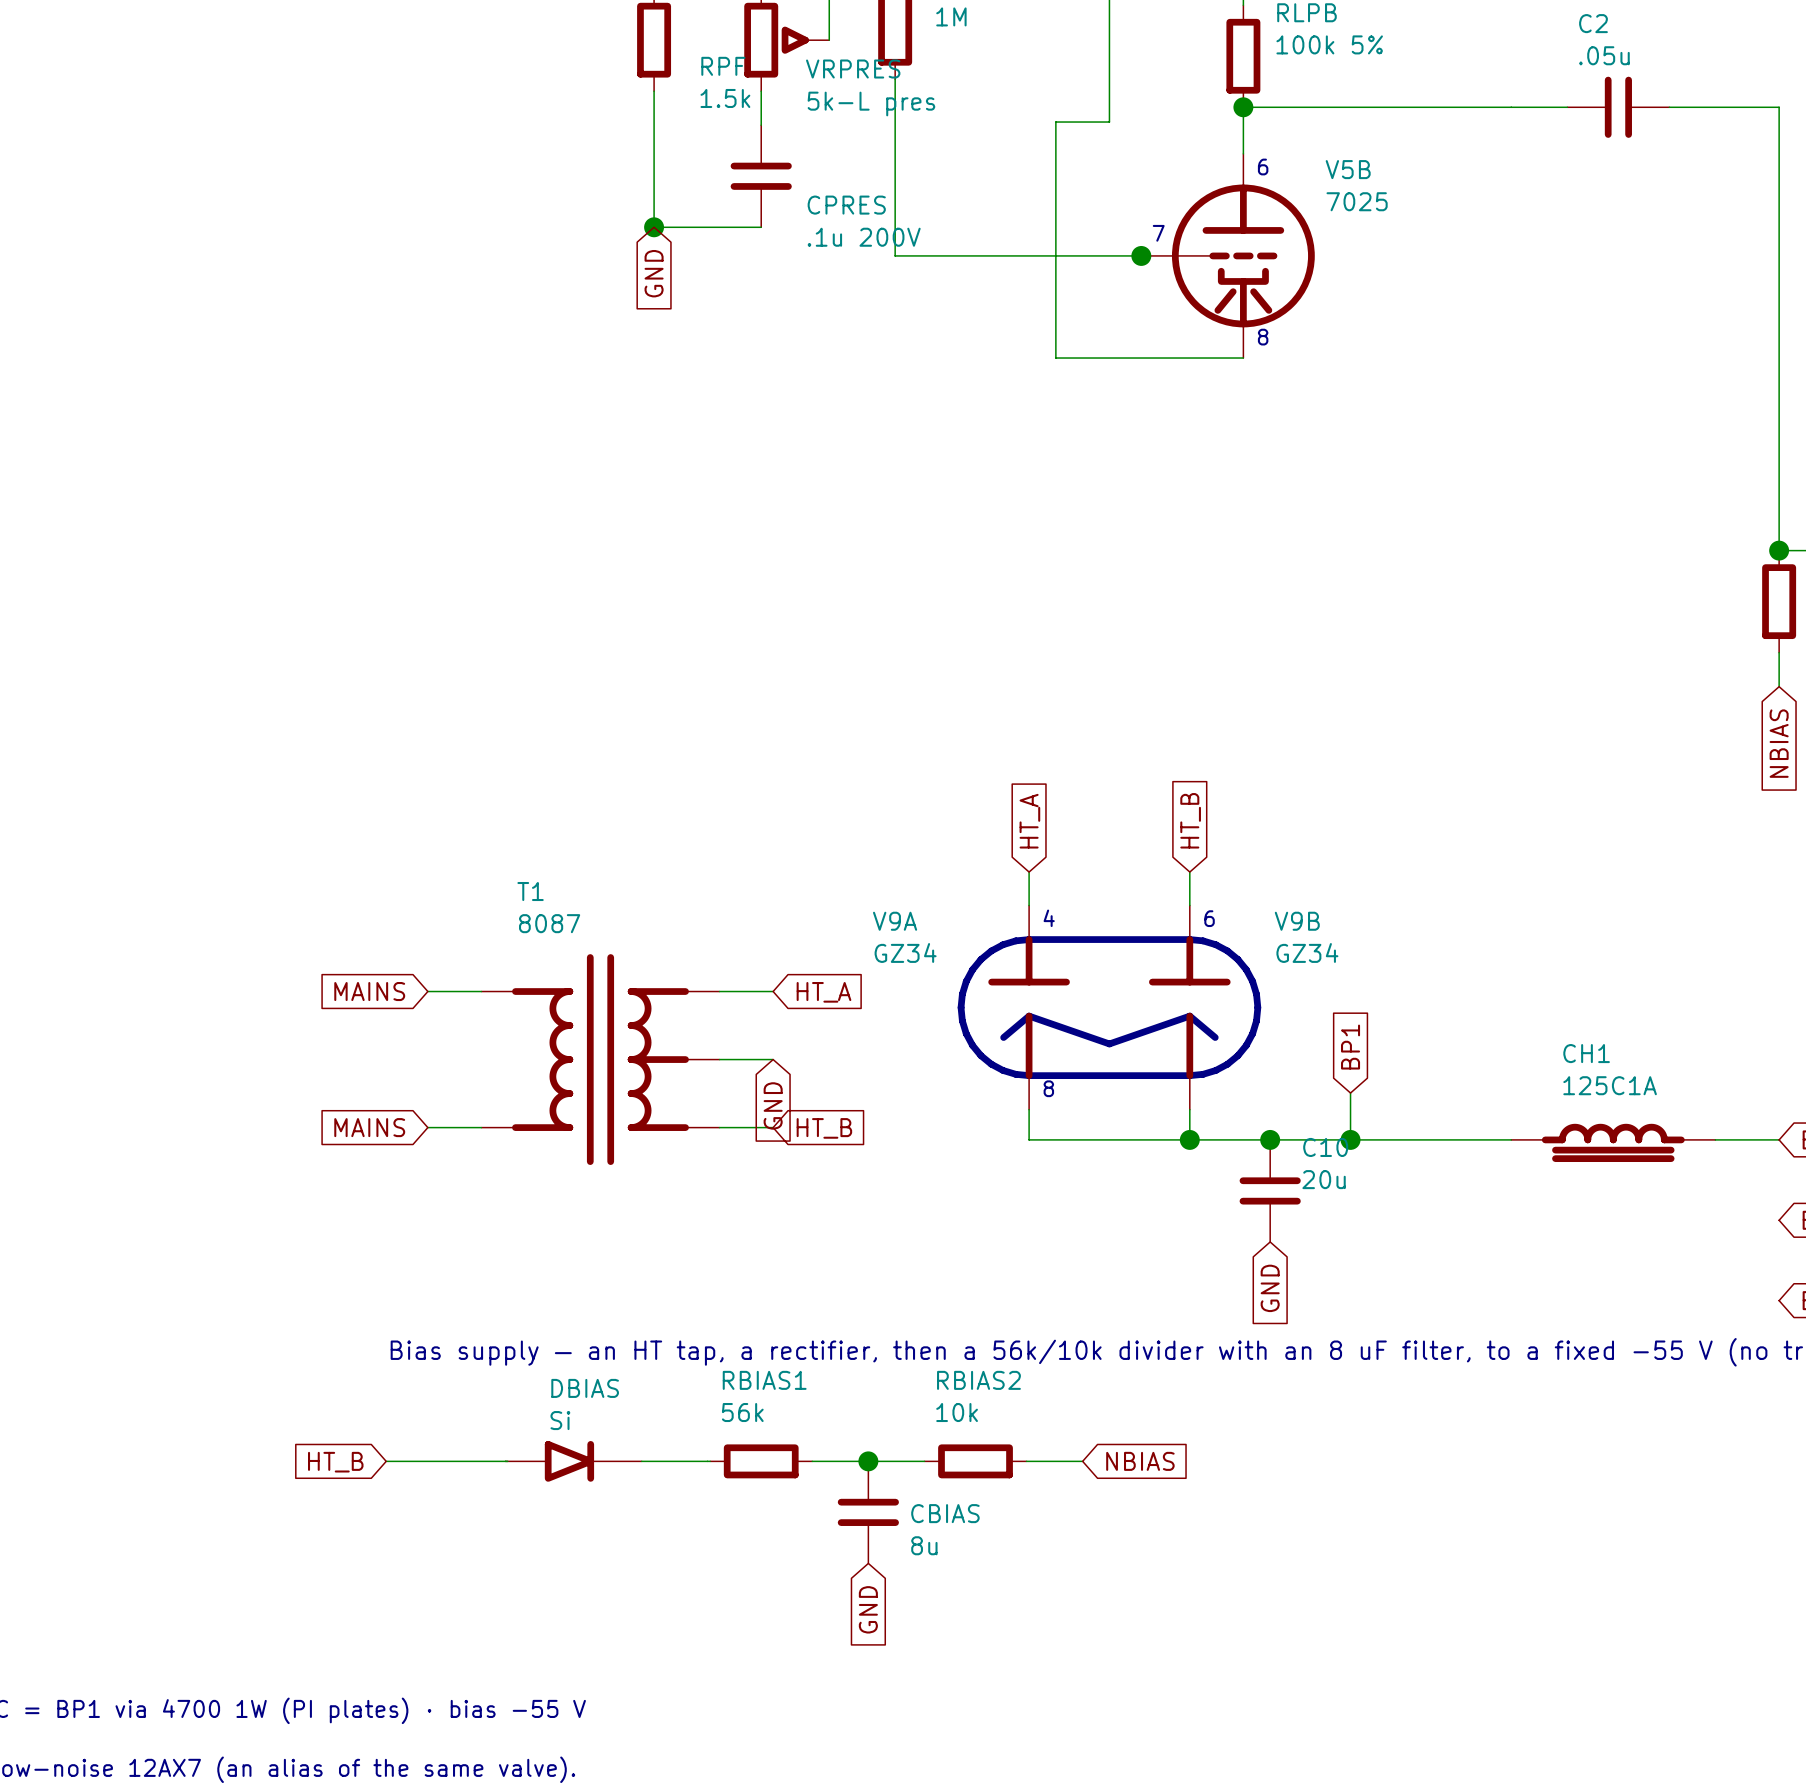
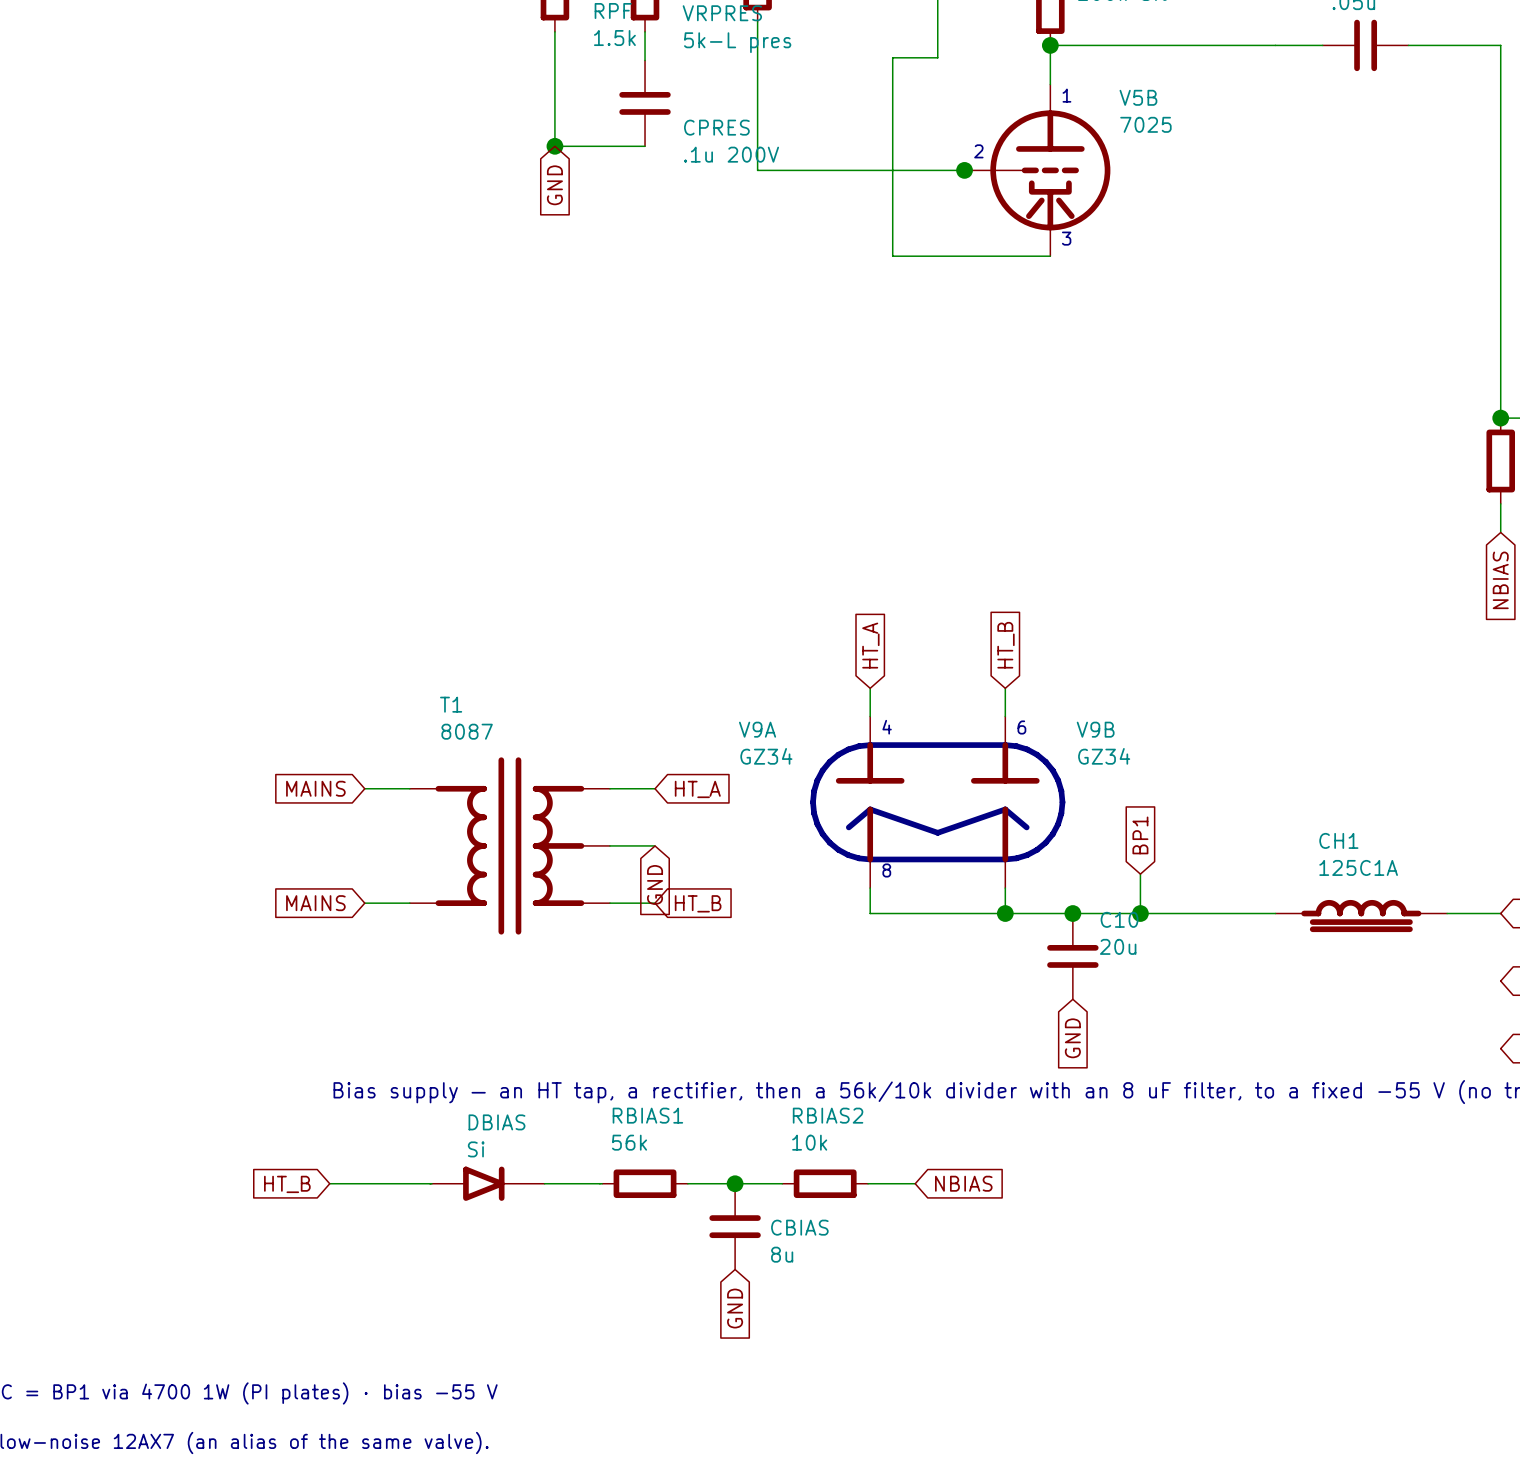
text: 6 (1263, 167) -> 1 (1066, 95)
text: 7 (1158, 233) -> 2 (978, 151)
text: 8 (1263, 337) -> 3 (1066, 238)

